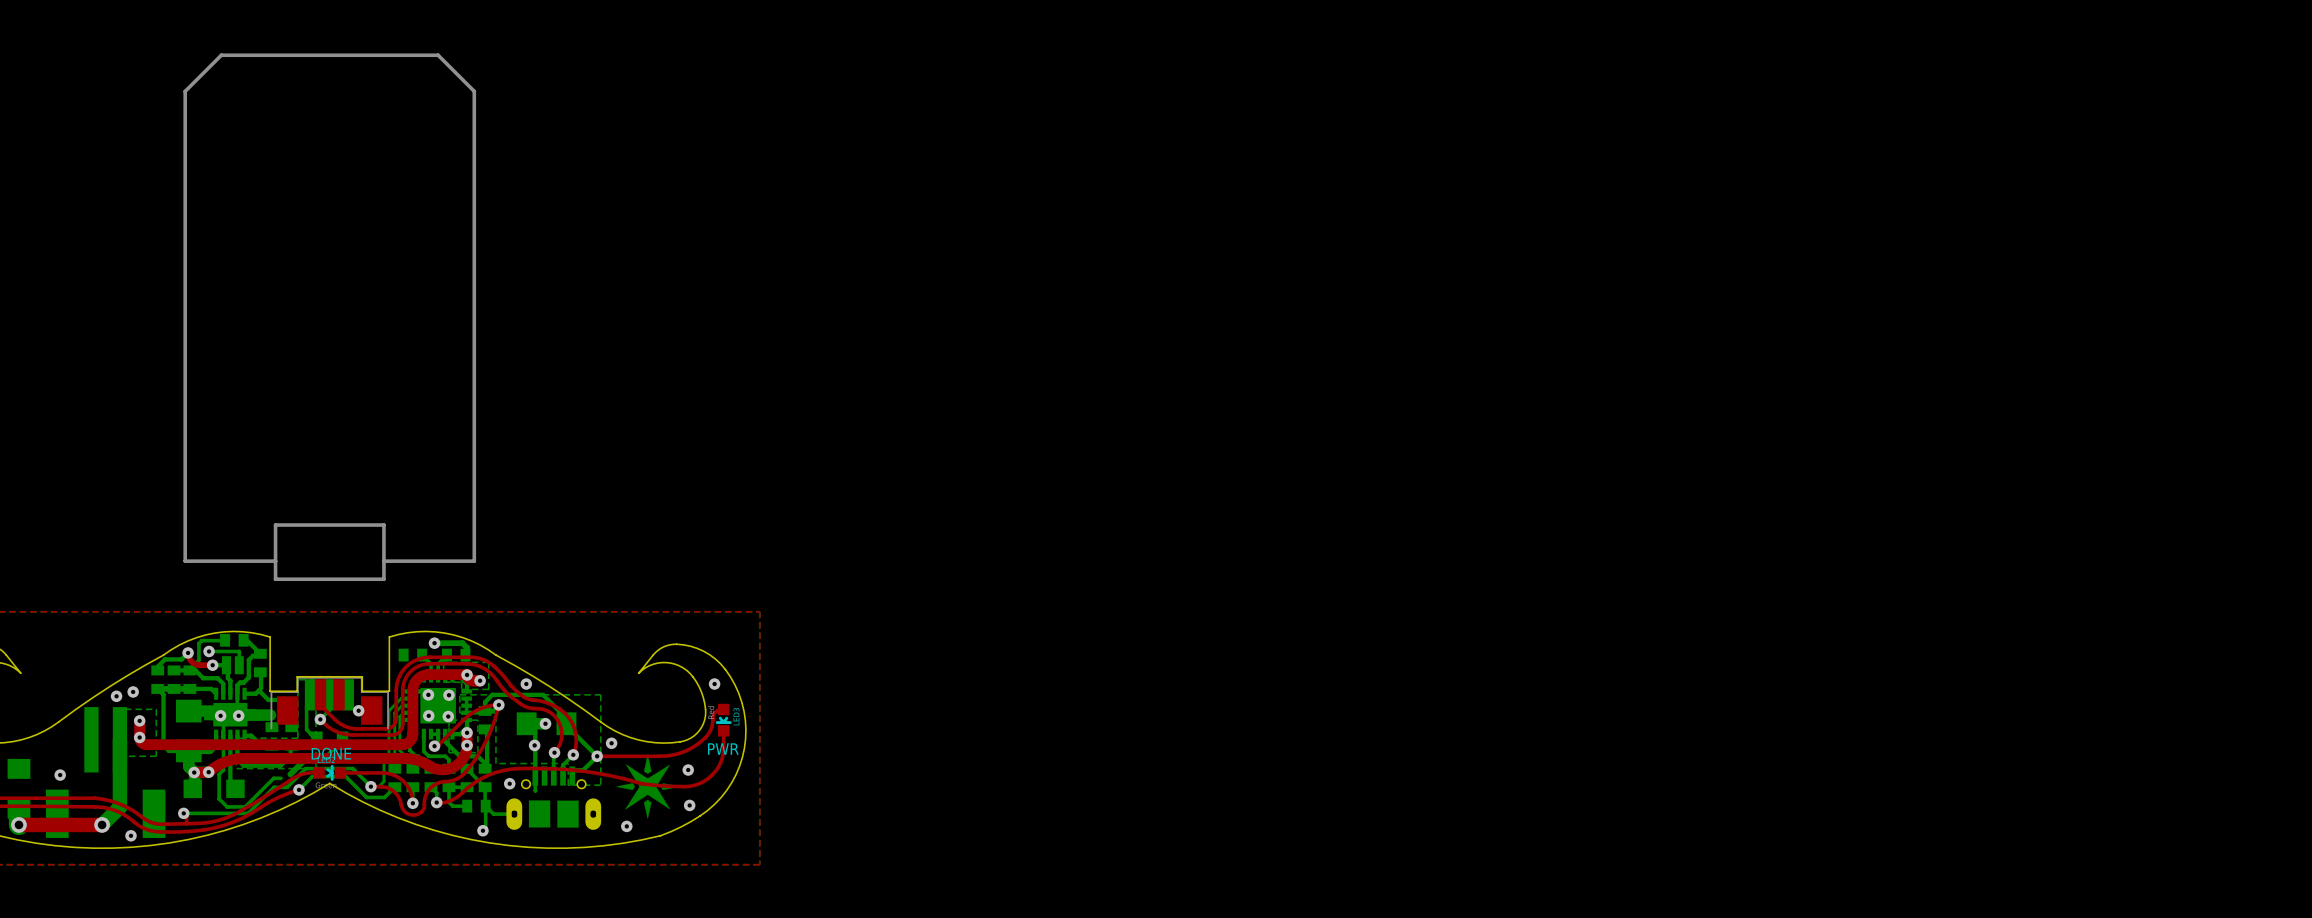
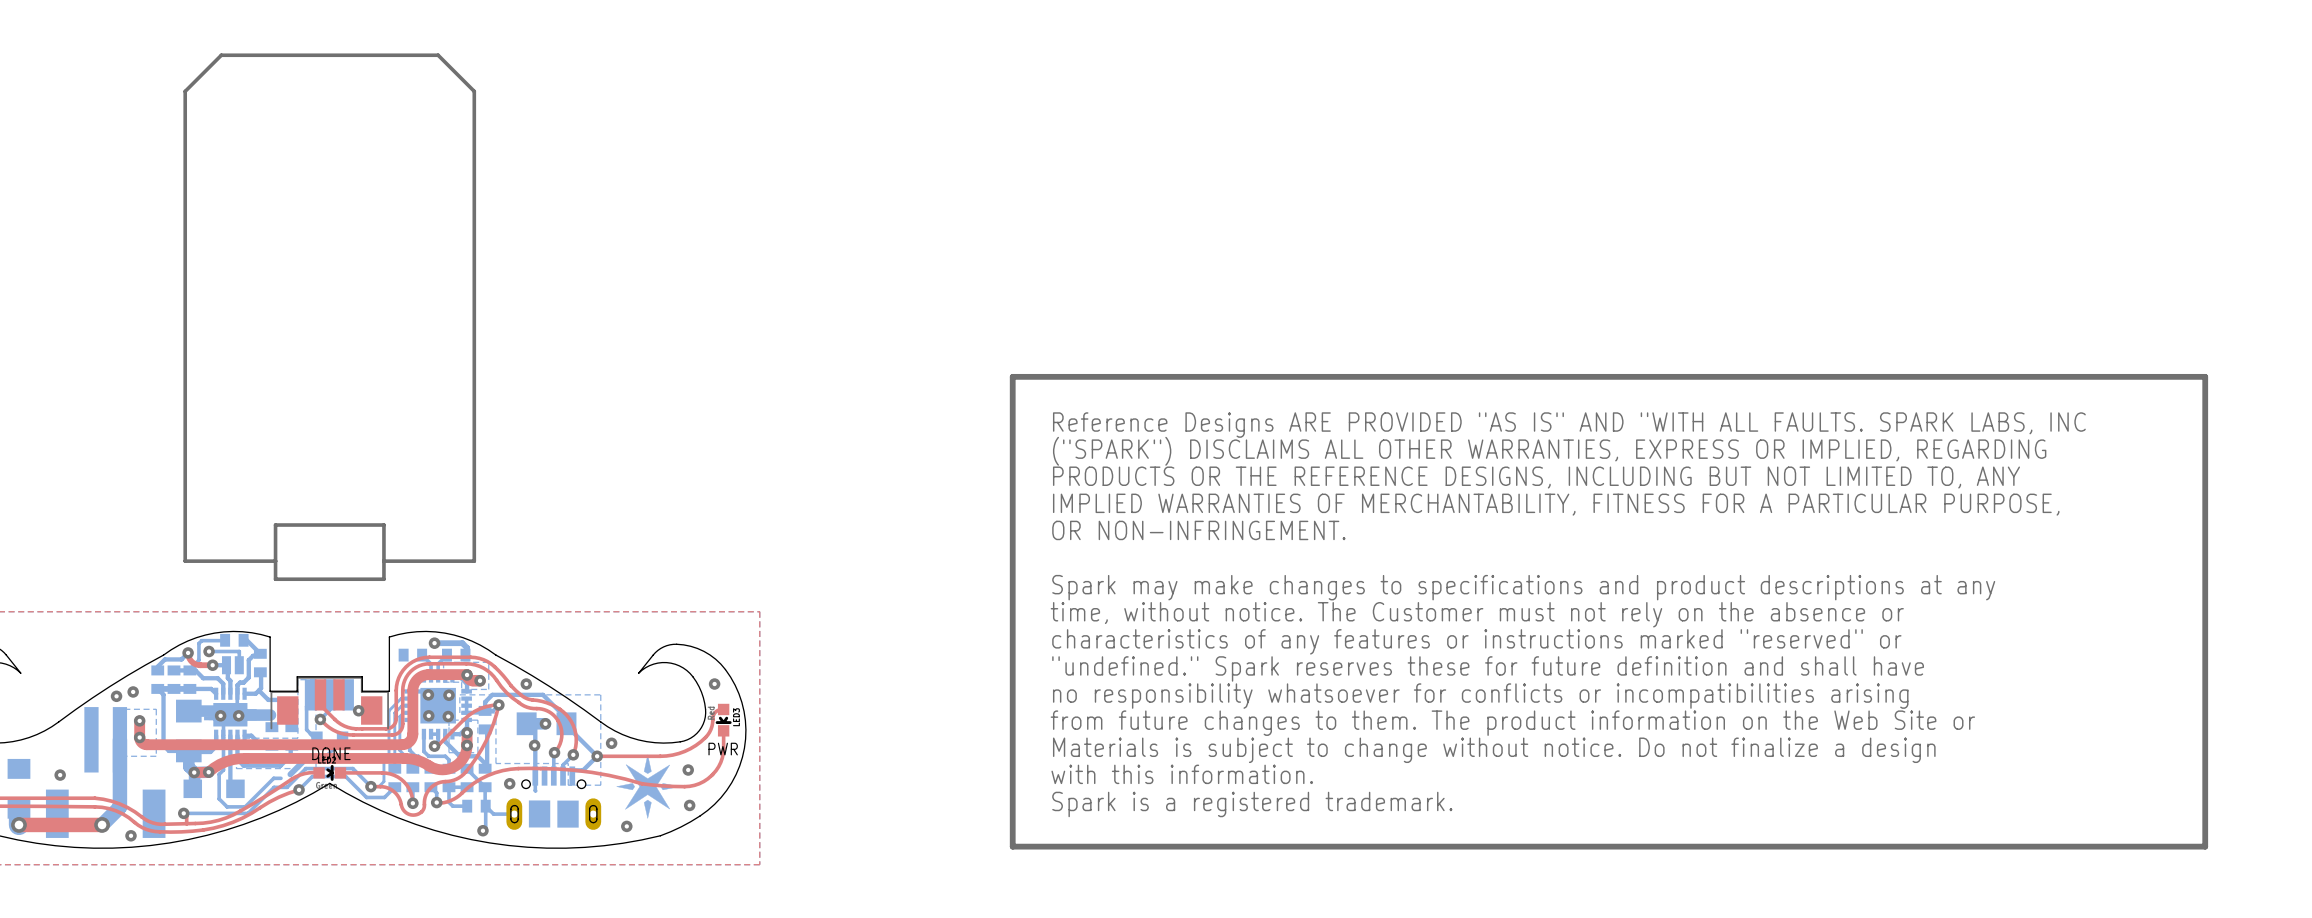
line: none -> (1012, 376) (1012, 846) (2205, 846) (2205, 376) (1012, 376)
text: none -> Reference Designs ARE PROVIDED "AS IS" AND "WITH ALL FAULTS. SPARK LABS, INC (1569, 425)
text: none -> ("SPARK") DISCLAIMS ALL OTHER WARRANTIES, EXPRESS OR IMPLIED, REGARDING (1549, 451)
text: none -> PRODUCTS OR THE REFERENCE DESIGNS, INCLUDING BUT NOT LIMITED TO, ANY (1536, 477)
text: none -> IMPLIED WARRANTIES OF MERCHANTABILITY, FITNESS FOR A PARTICULAR PURPOSE, (1556, 504)
text: none -> OR NON-INFRINGEMENT. (1198, 530)
text: none -> Spark may make changes to specifications and product descriptions at any (1523, 587)
text: none -> time, without notice. The Customer must not rely on the absence or (1477, 614)
text: none -> characteristics of any features or instructions marked "reserved" or (1476, 641)
text: none -> "undefined." Spark reserves these for future definition and shall have (1488, 668)
text: none -> no responsibility whatsoever for conflicts or incompatibilities arising (1480, 696)
text: none -> from future changes to them. The product information on the Web Site or (1512, 723)
text: none -> Materials is subject to change without notice. Do not finalize a design (1494, 750)
text: none -> with this information. (1182, 774)
text: none -> Spark is a registered trademark. (1252, 804)

